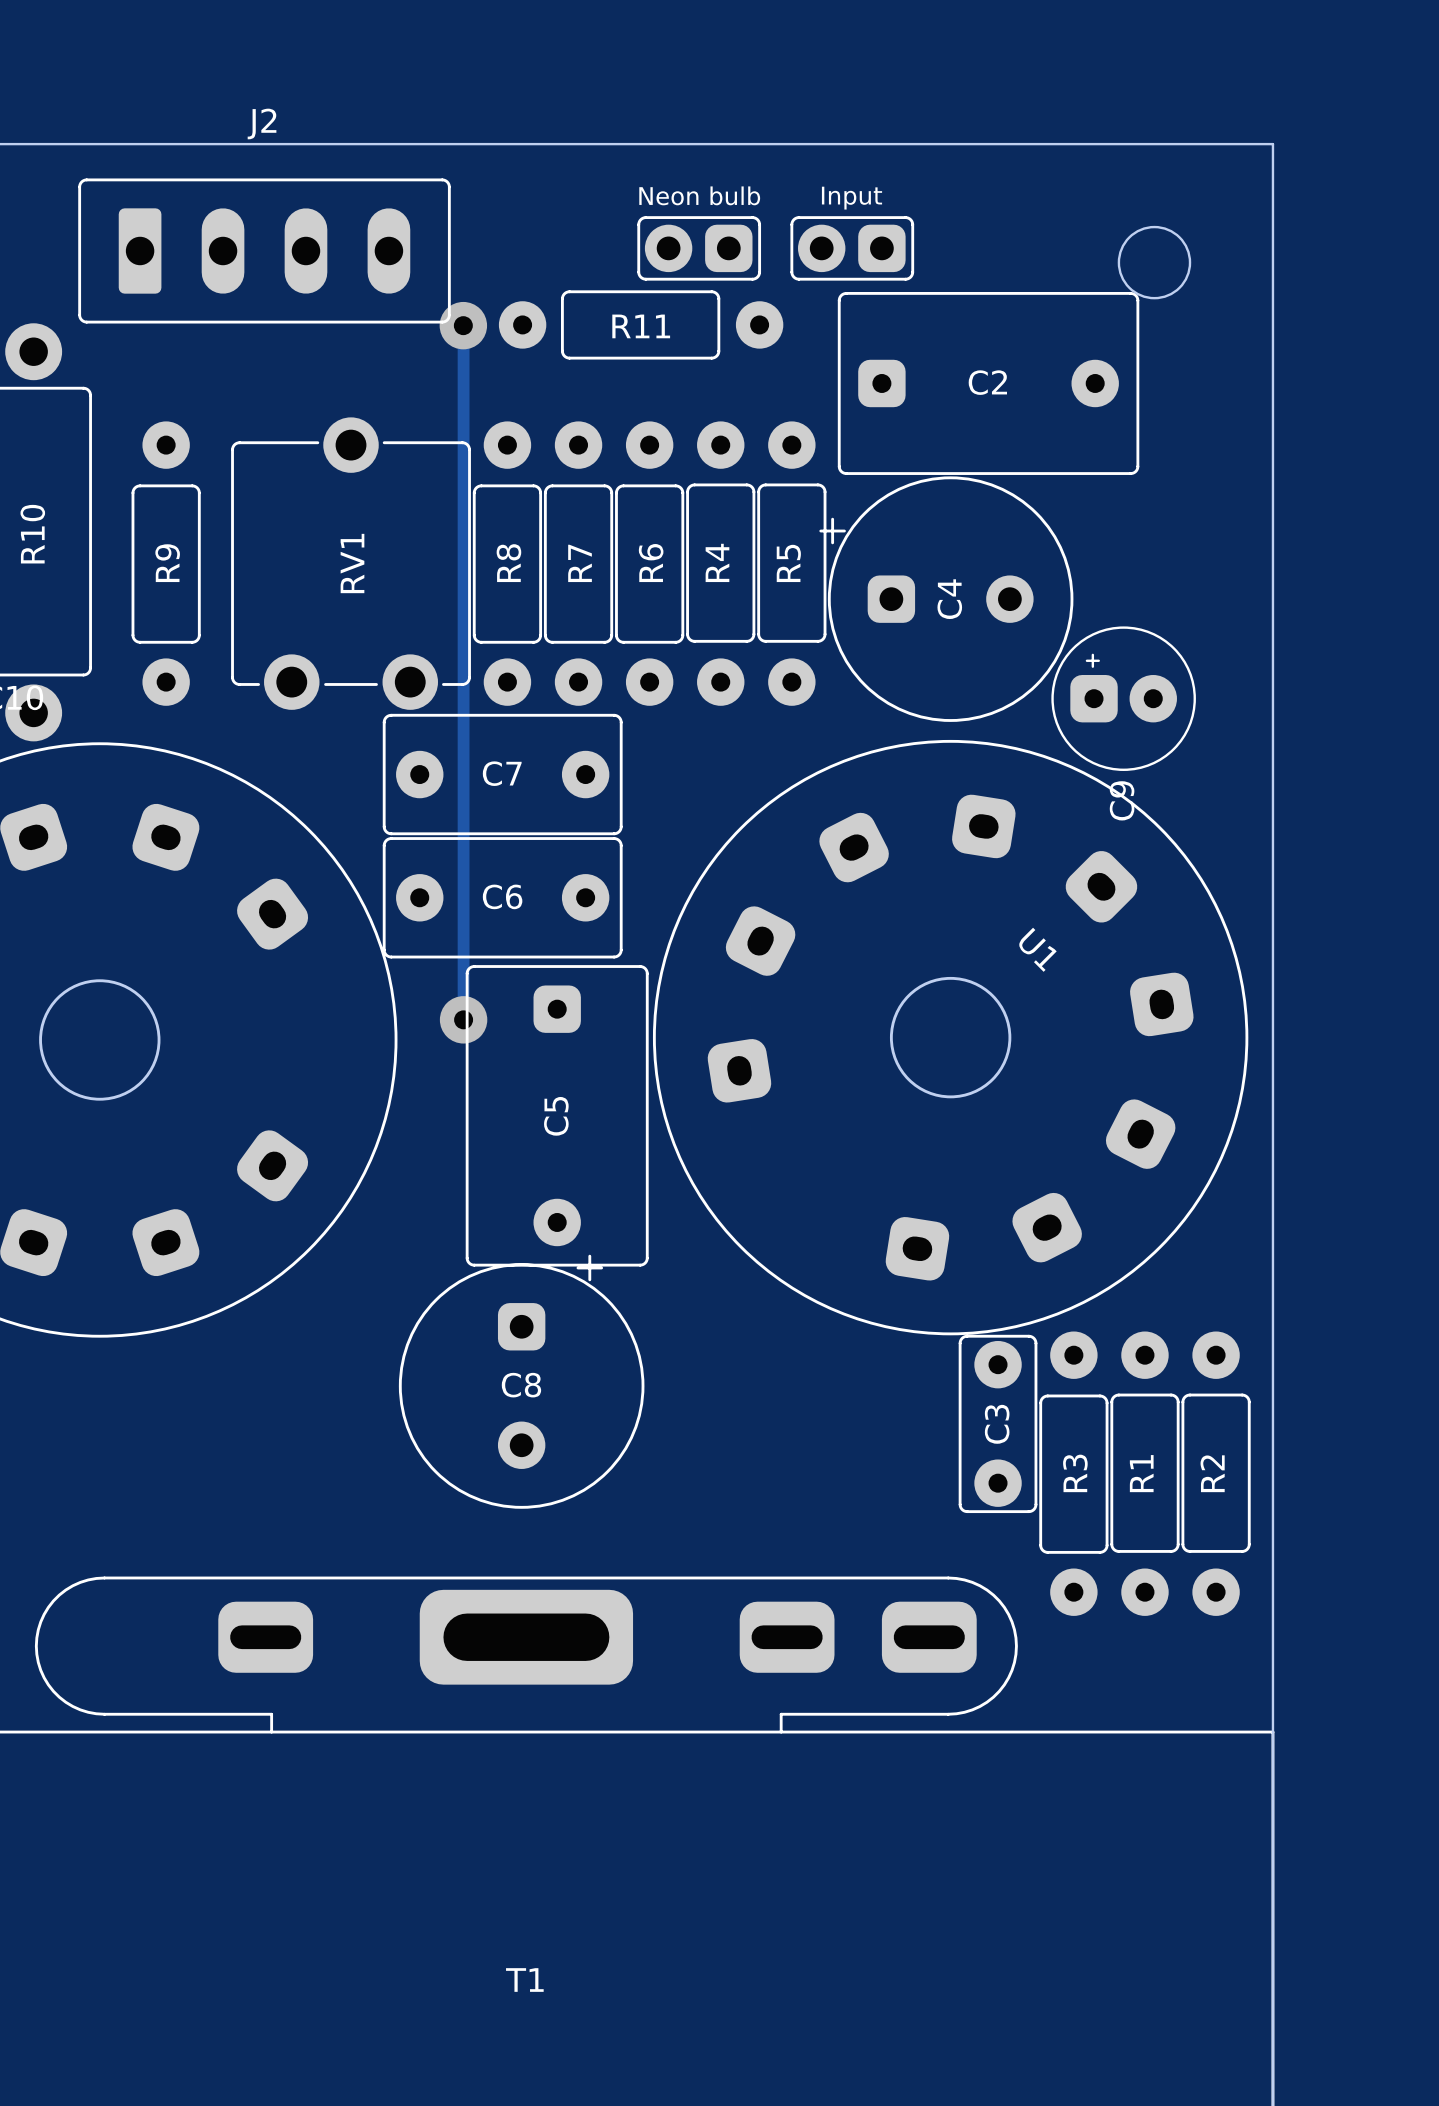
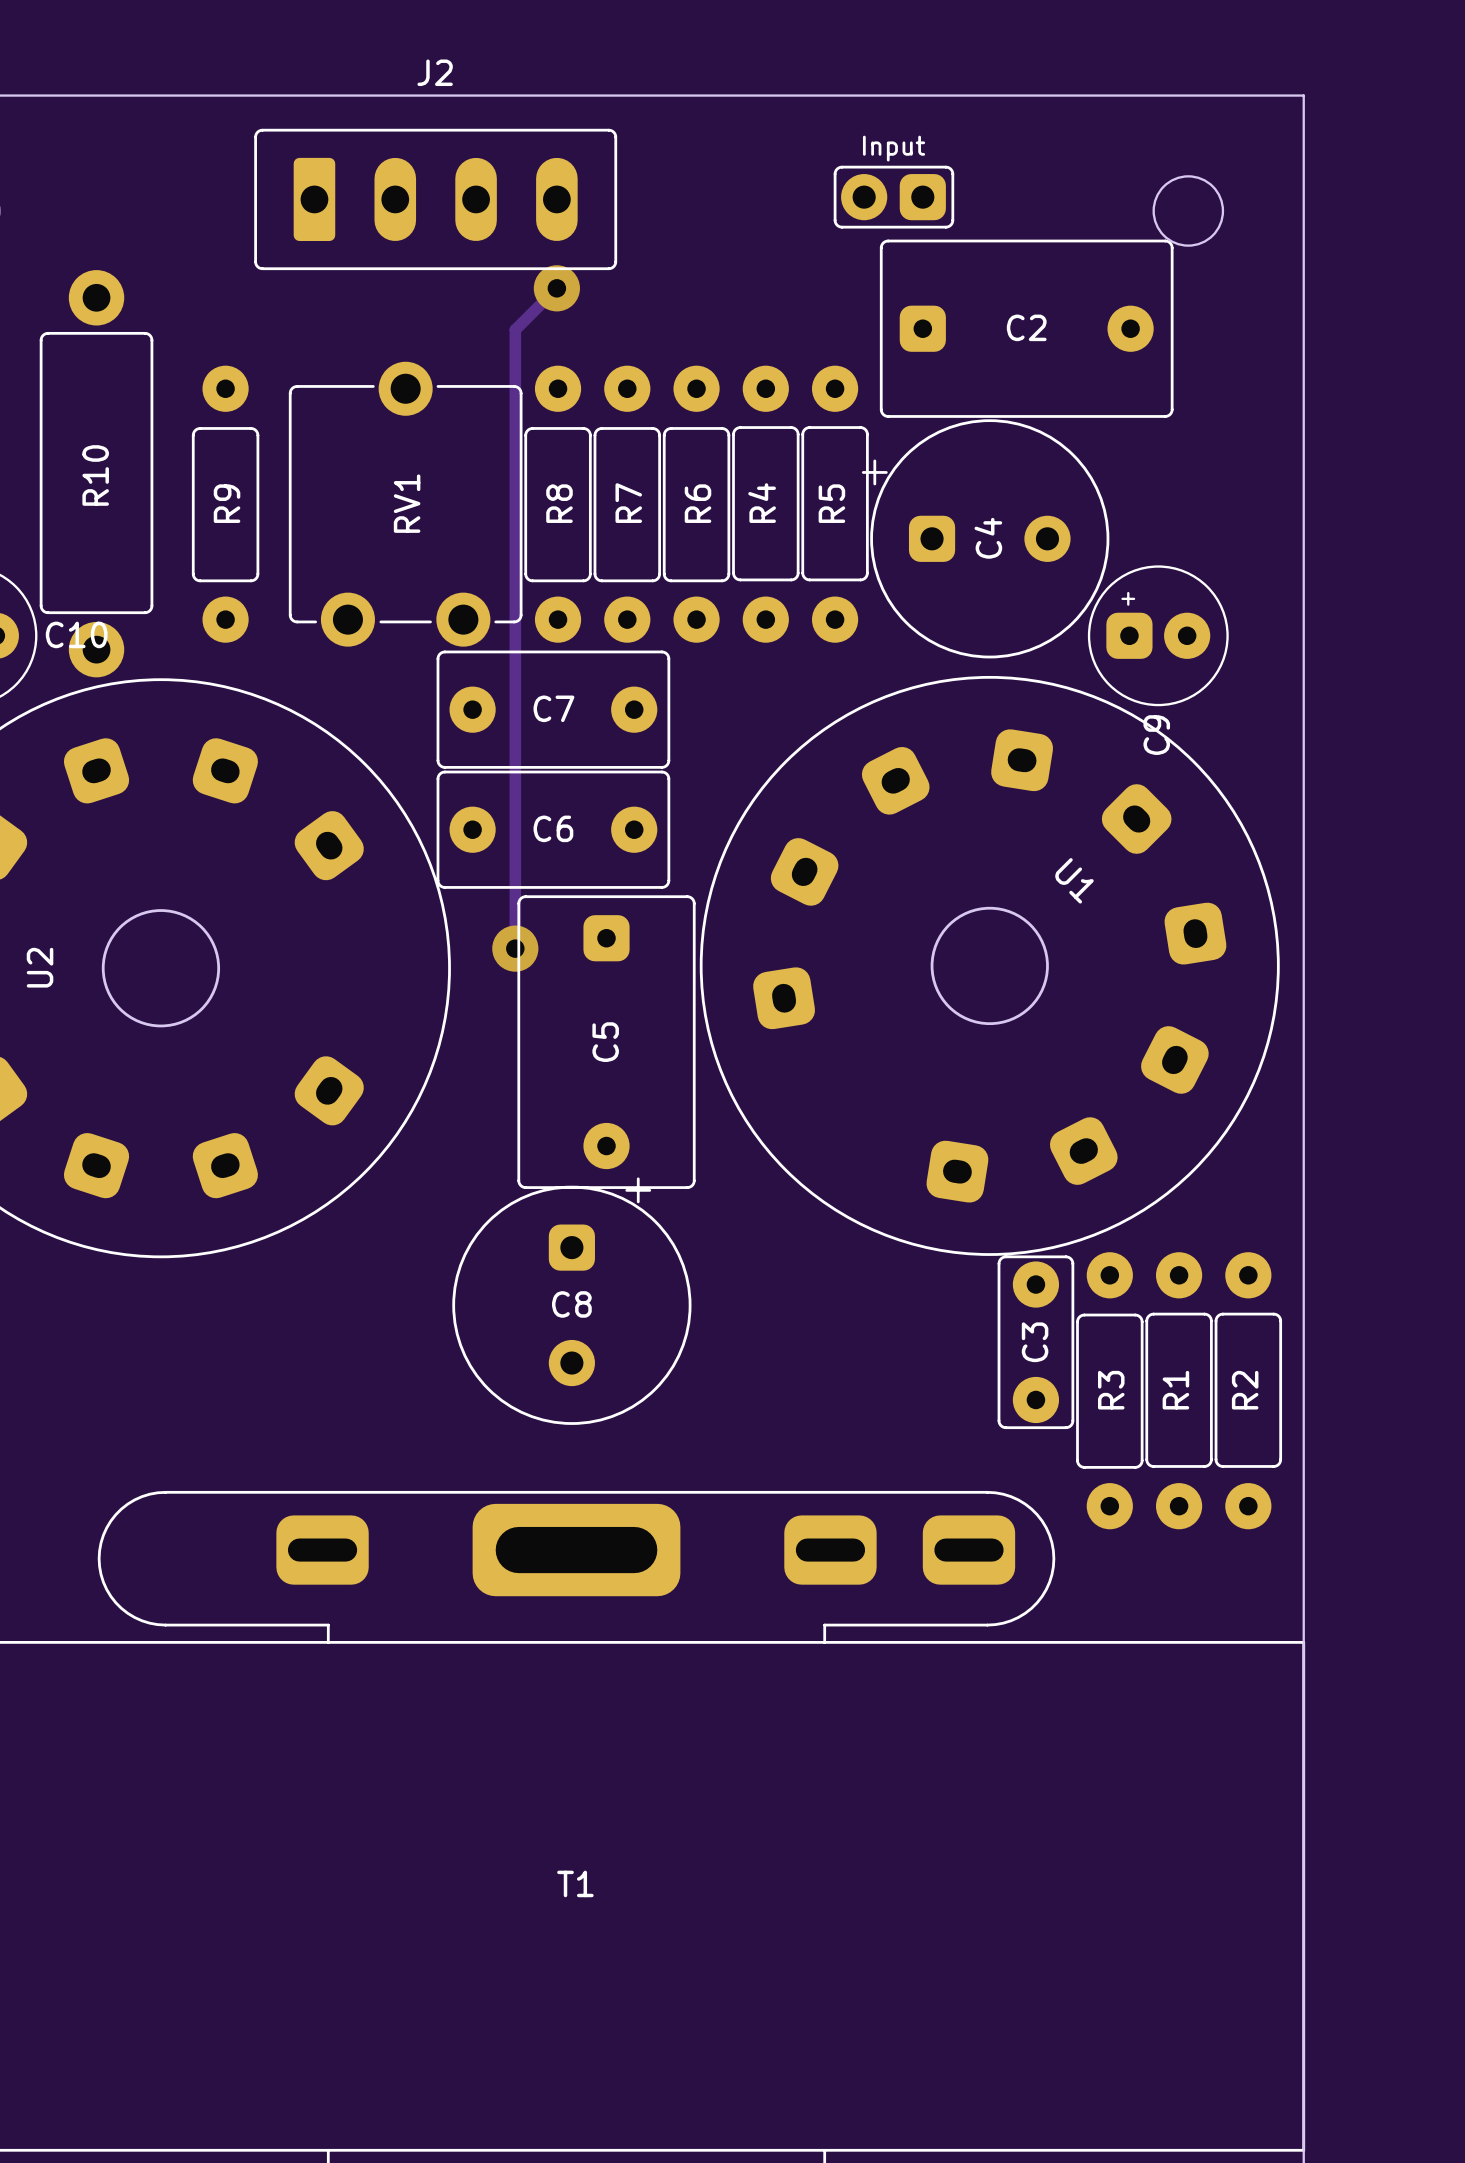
part: Neon bulb (699, 248) -> none
J2 position: (264, 250) -> (435, 199)
R11: (641, 324) -> none
track: (463, 325) (463, 384) -> (556, 288) (515, 329)
via position: (463, 325) -> (556, 288)

